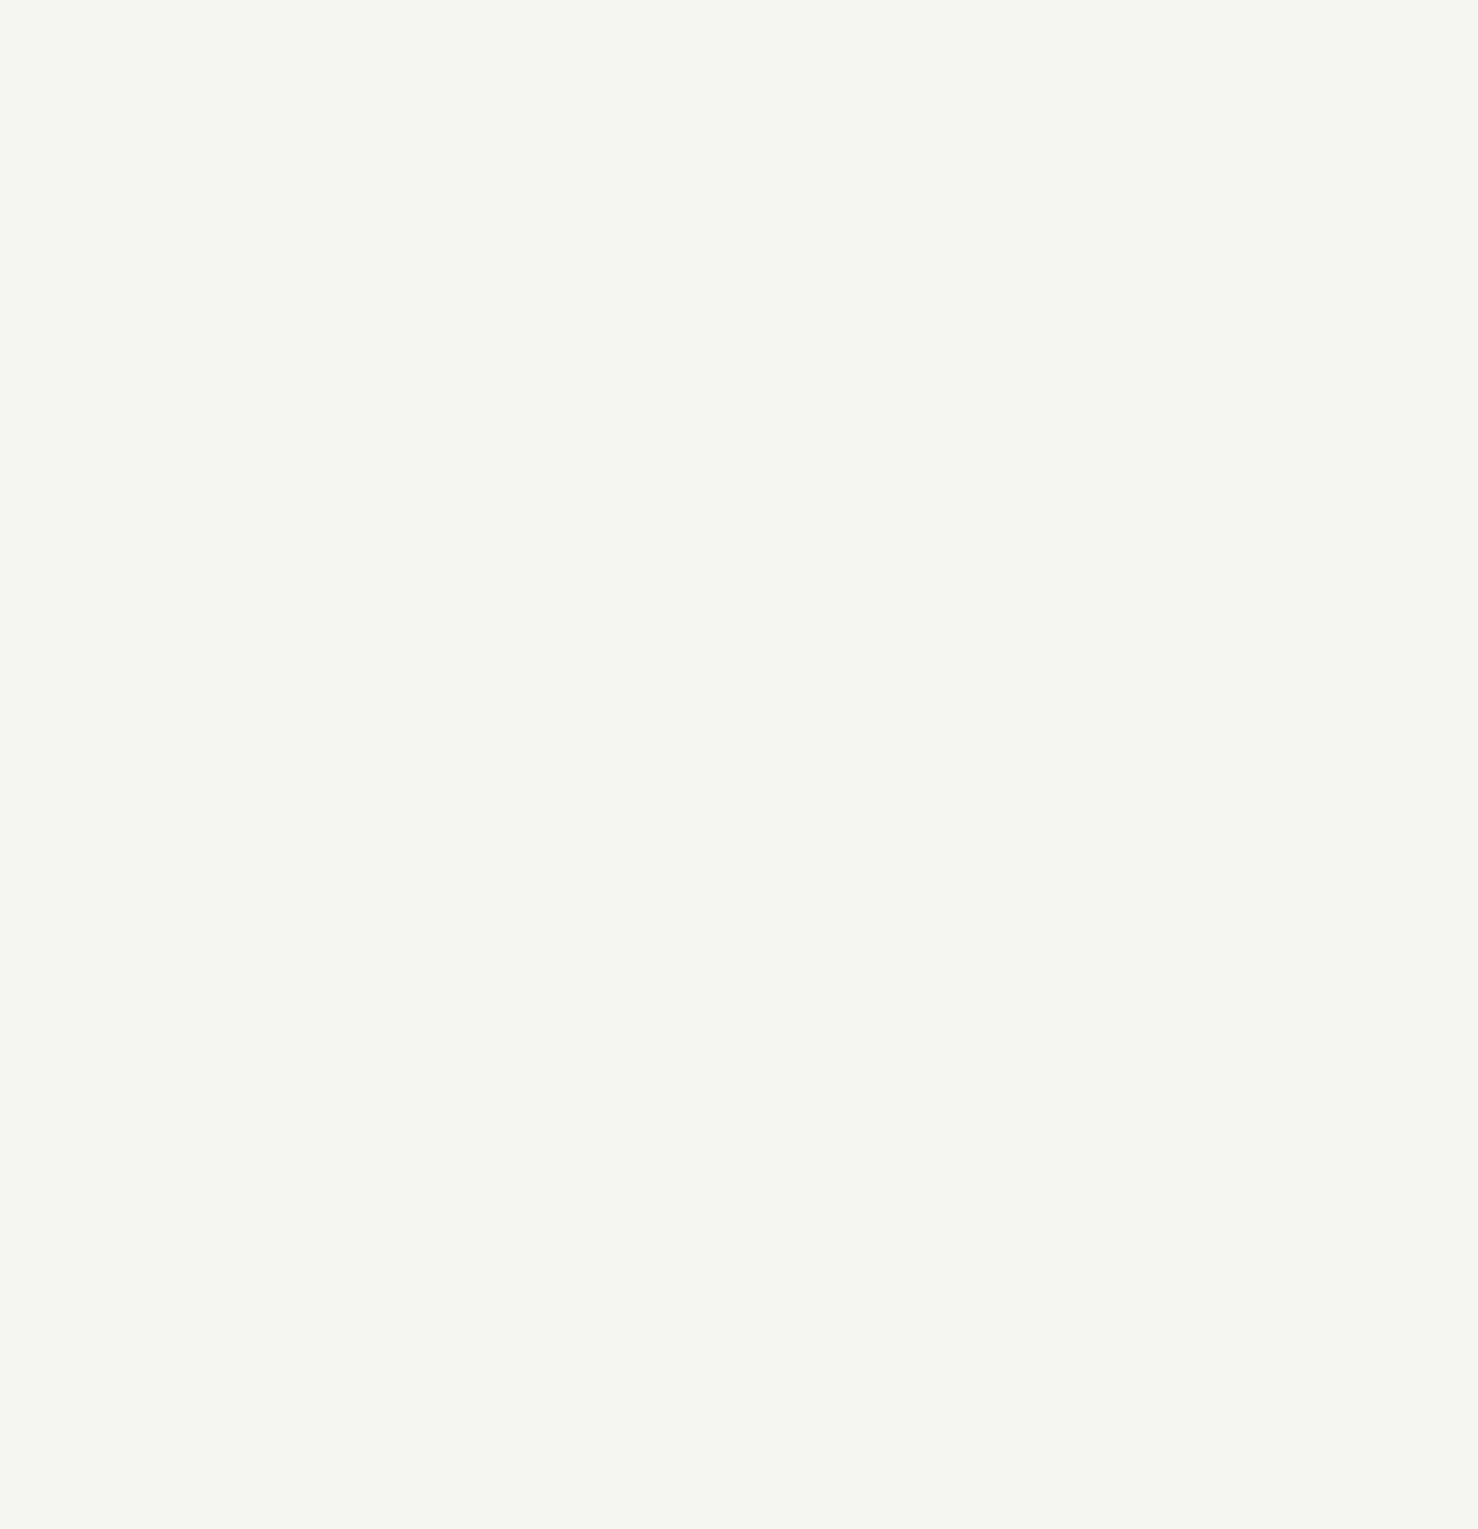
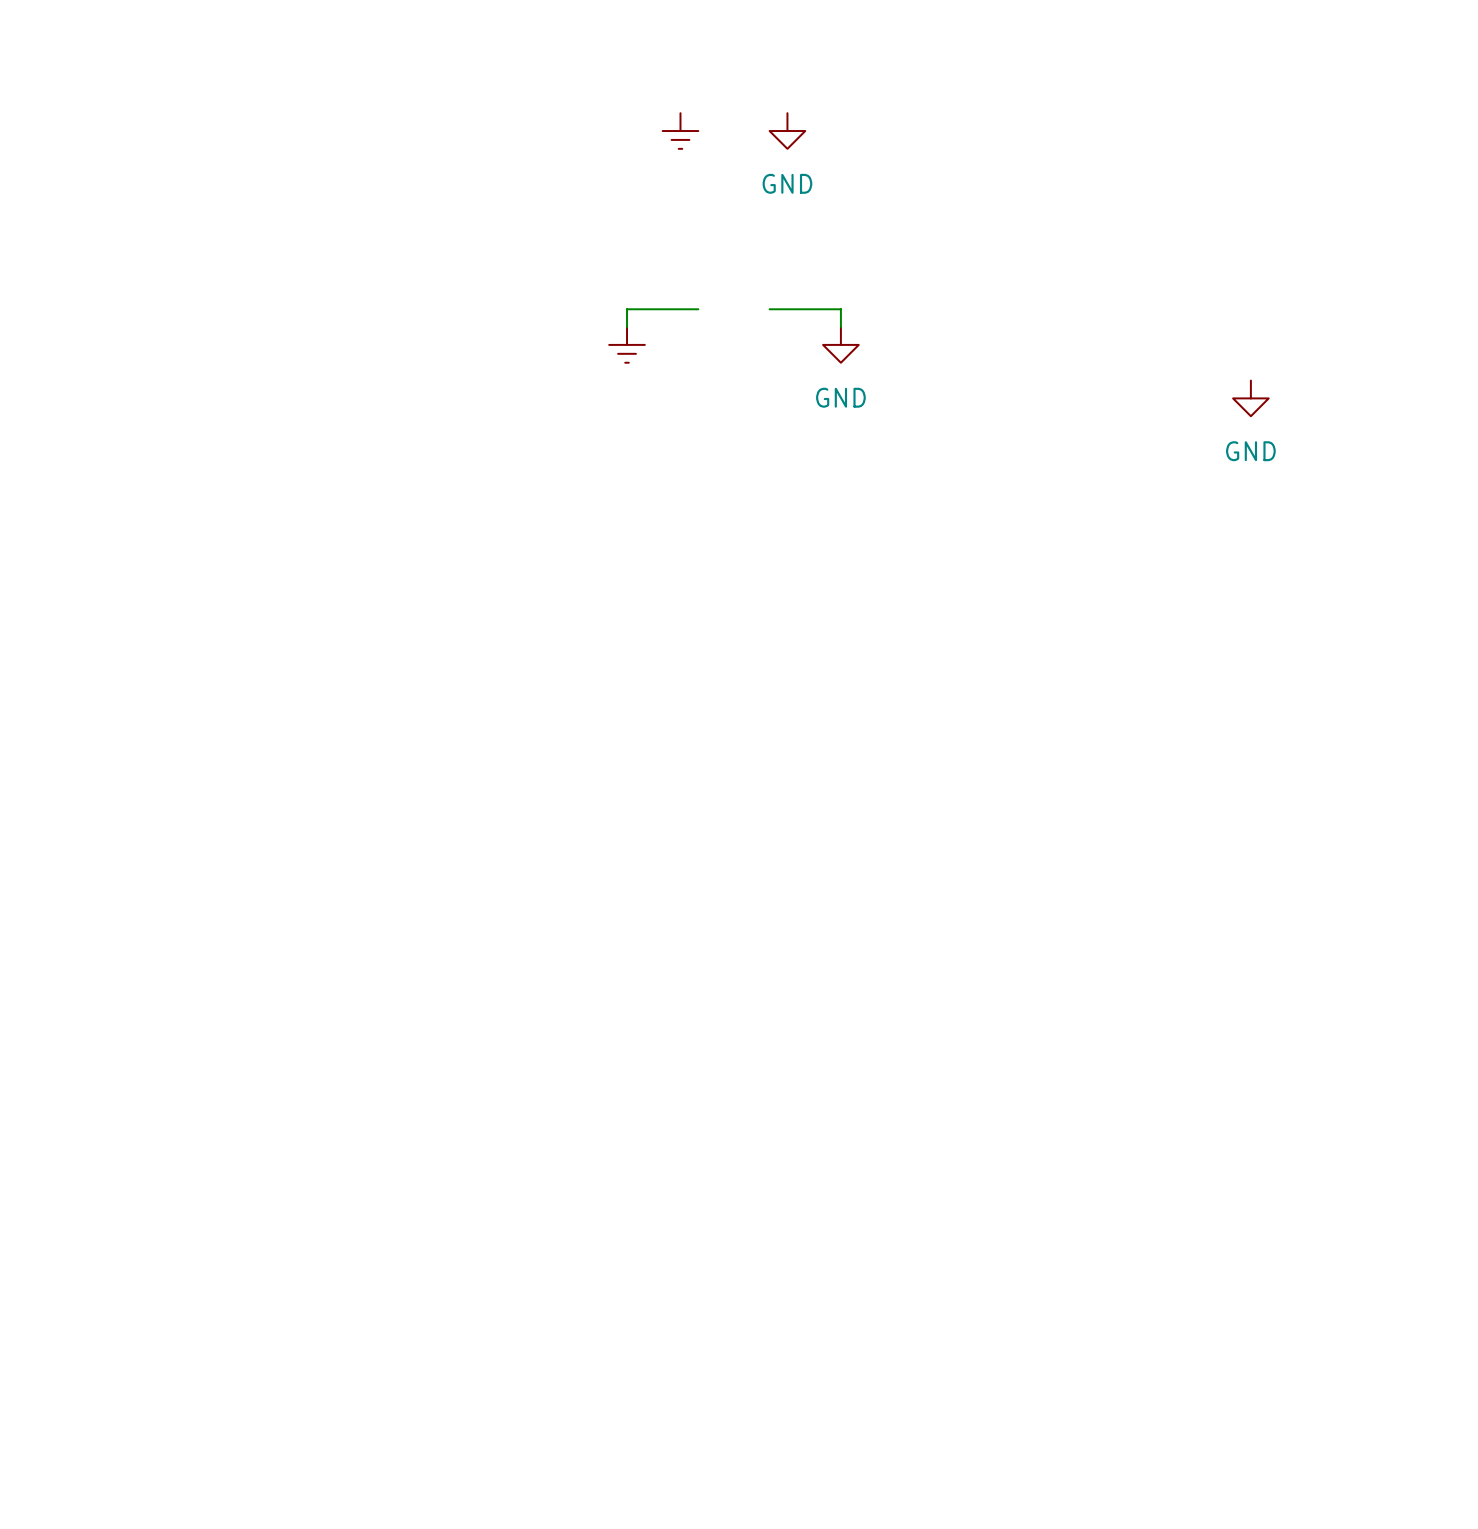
power symbol: none -> (680, 131)
power symbol: none -> GND (787, 131)
wire: none -> (698, 309) (627, 309) (627, 327)
wire: none -> (769, 309) (840, 309) (840, 327)
power symbol: none -> (627, 344)
power symbol: none -> GND (840, 344)
power symbol: none -> GND (1250, 398)

